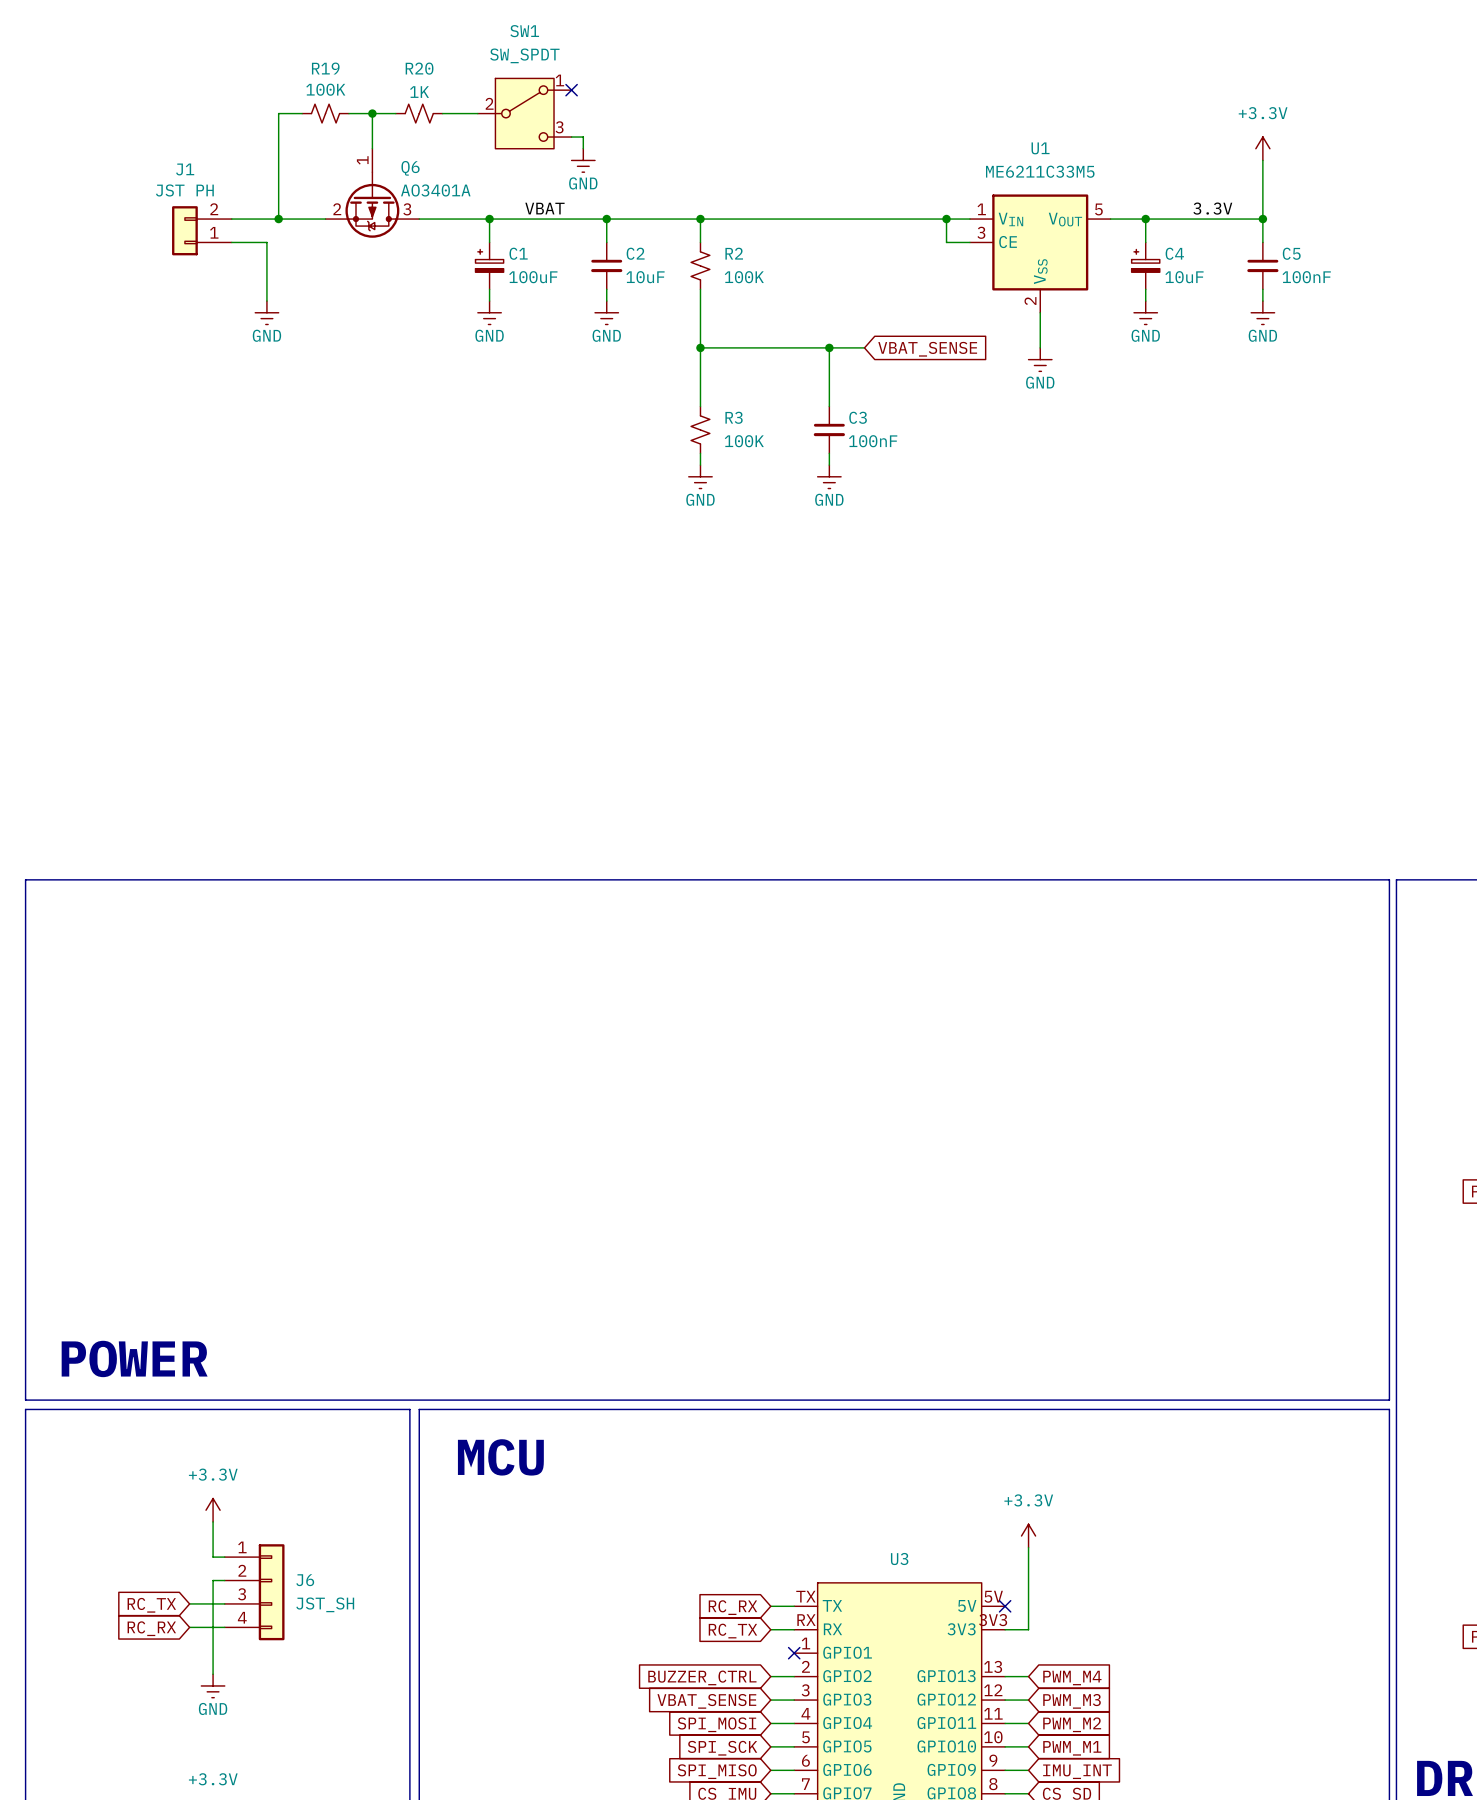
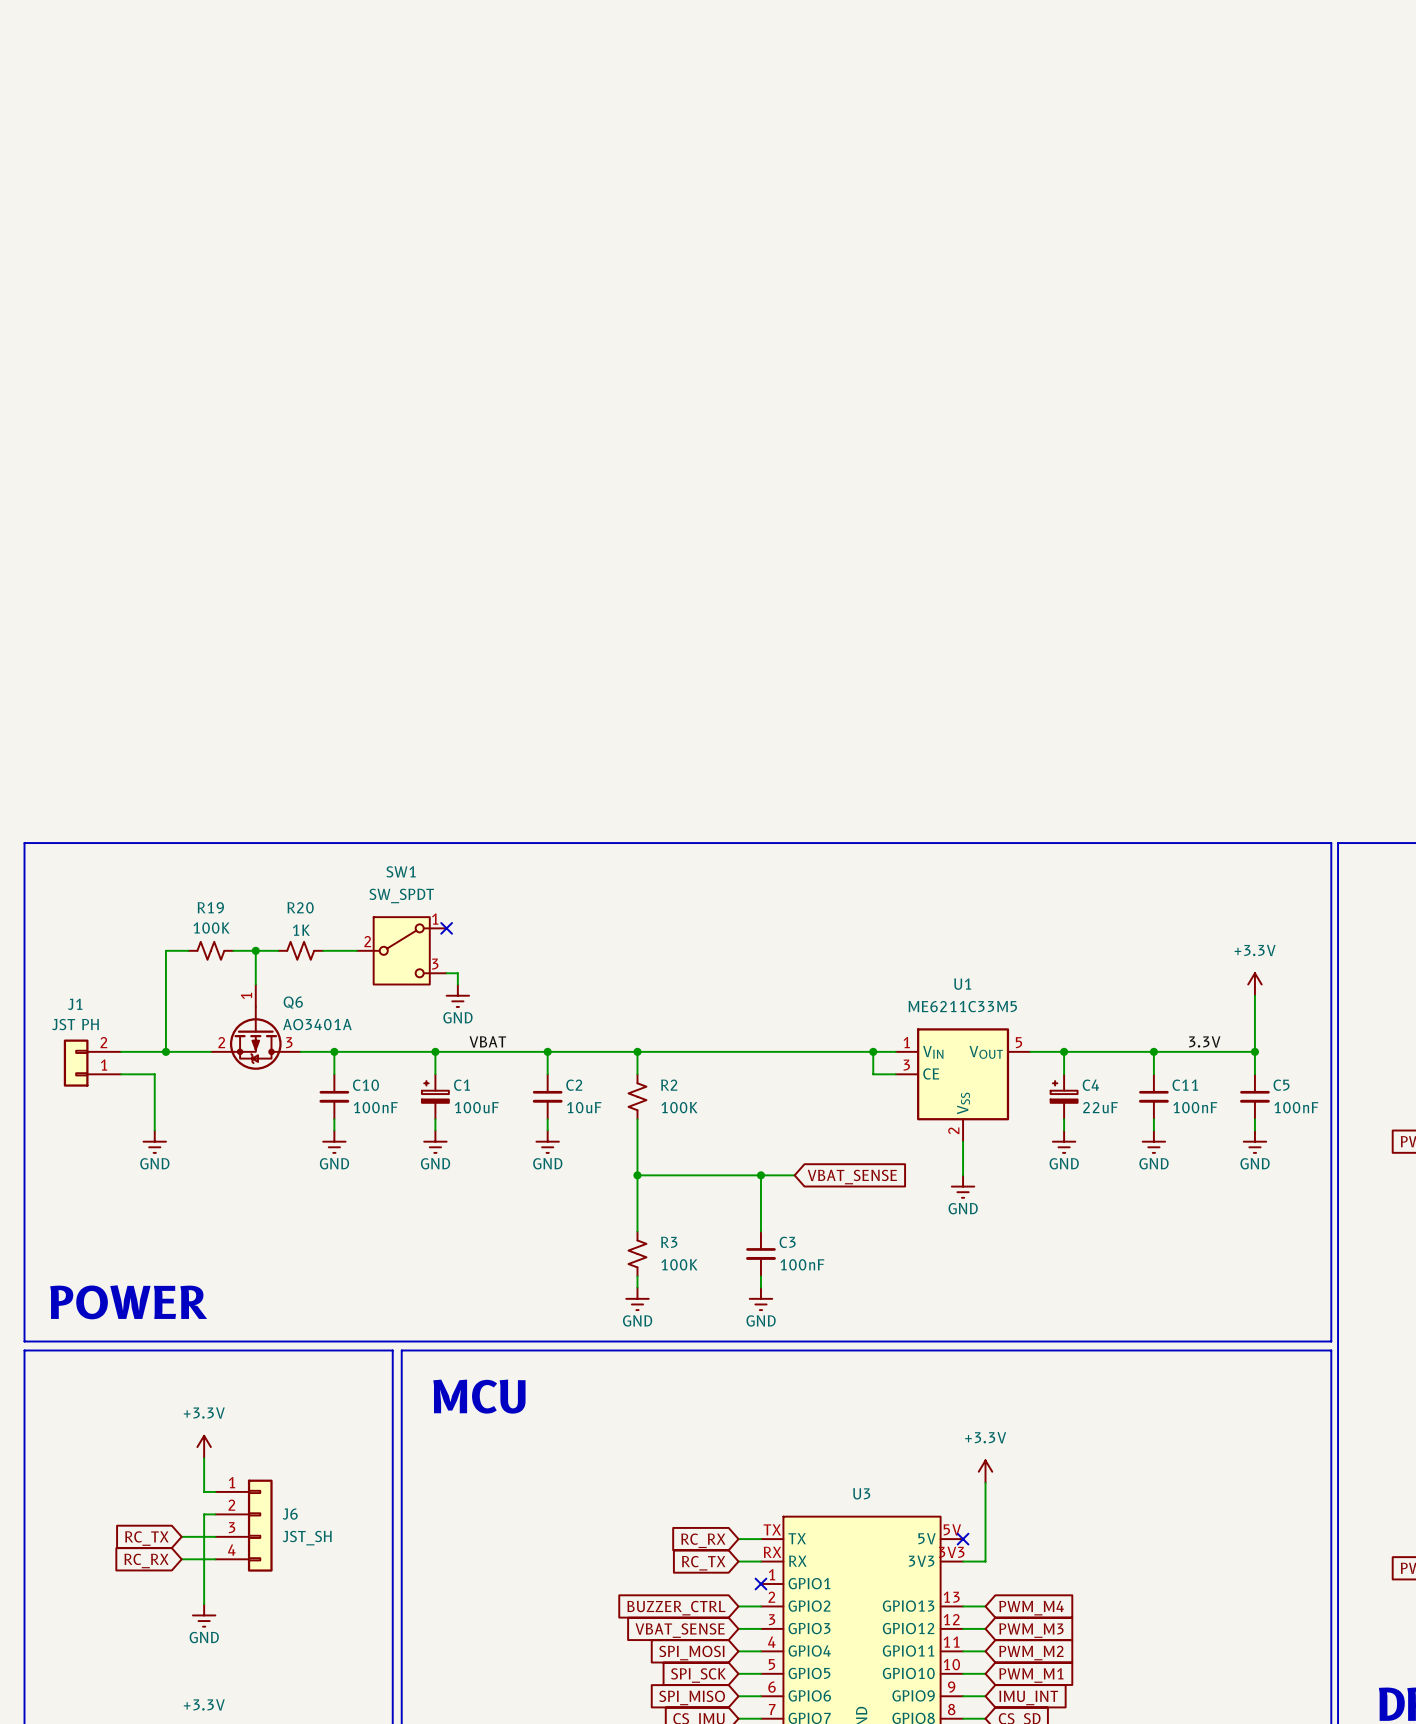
no-connect mark: (571, 90) -> none
wire: (302, 113) (278, 113) (278, 219) -> none
R19 position: (325, 113) -> (210, 950)
wire: (348, 113) (395, 113) -> none
wire: (372, 113) (372, 148) -> none
junction: (372, 113) -> none
R20 position: (419, 113) -> (300, 950)
wire: (442, 113) (477, 113) -> none
SW1 position: (524, 113) -> (401, 950)
wire: (571, 137) (583, 137) (583, 148) -> none
power symbol: +3.3V (1262, 148) -> none
power symbol: GND (583, 160) -> none
wire: (1262, 160) (1262, 242) -> none
Q6 position: (372, 193) -> (255, 1027)
label: VBAT (544, 208) -> none
label: 3.3V (1212, 208) -> none
wire: (231, 219) (325, 219) -> none
junction: (278, 219) -> none
wire: (419, 219) (969, 219) -> none
wire: (489, 219) (489, 242) -> none
junction: (489, 219) -> none
wire: (606, 219) (606, 242) -> none
junction: (606, 219) -> none
wire: (700, 219) (700, 242) -> none
junction: (700, 219) -> none
wire: (946, 219) (946, 242) (969, 242) -> none
junction: (946, 219) -> none
wire: (1110, 219) (1262, 219) -> none
wire: (1145, 219) (1145, 242) -> none
junction: (1145, 219) -> none
junction: (1262, 219) -> none
J1 position: (201, 230) -> (92, 1063)
wire: (231, 242) (266, 242) (266, 301) -> none
U1 position: (1040, 253) -> (963, 1084)
C1 position: (489, 265) -> (435, 1096)
C2 position: (606, 265) -> (547, 1096)
R2 position: (700, 265) -> (637, 1096)
C4 position: (1145, 265) -> (1064, 1096)
C5 position: (1262, 265) -> (1254, 1096)
C4 value: 10uF (1184, 277) -> 22uF (1100, 1107)
wire: (489, 289) (489, 301) -> none
wire: (606, 289) (606, 301) -> none
wire: (700, 289) (700, 406) -> none
wire: (1145, 289) (1145, 301) -> none
wire: (1262, 289) (1262, 301) -> none
power symbol: GND (266, 312) -> none
power symbol: GND (489, 312) -> none
power symbol: GND (606, 312) -> none
wire: (1040, 312) (1040, 347) -> none
power symbol: GND (1145, 312) -> none
power symbol: GND (1262, 312) -> none
wire: (700, 347) (864, 347) -> none
junction: (700, 347) -> none
wire: (829, 347) (829, 406) -> none
junction: (829, 347) -> none
global label: VBAT_SENSE (927, 349) -> none
power symbol: GND (1040, 359) -> none
R3 position: (700, 429) -> (637, 1253)
C3 position: (829, 429) -> (760, 1253)
wire: (700, 453) (700, 465) -> none
wire: (829, 453) (829, 465) -> none
power symbol: GND (700, 476) -> none
power symbol: GND (829, 476) -> none
no-connect mark: none -> (446, 928)
wire: none -> (188, 950) (165, 950) (165, 1051)
wire: none -> (233, 950) (278, 950)
wire: none -> (255, 950) (255, 984)
junction: none -> (255, 950)
wire: none -> (323, 950) (356, 950)
wire: none -> (446, 973) (457, 973) (457, 984)
power symbol: none -> +3.3V (1254, 984)
power symbol: none -> GND (457, 995)
wire: none -> (1254, 995) (1254, 1074)
label: none -> VBAT (487, 1041)
label: none -> 3.3V (1204, 1041)
wire: none -> (121, 1051) (210, 1051)
junction: none -> (165, 1051)
wire: none -> (300, 1051) (895, 1051)
wire: none -> (334, 1051) (334, 1074)
junction: none -> (334, 1051)
wire: none -> (435, 1051) (435, 1074)
junction: none -> (435, 1051)
wire: none -> (547, 1051) (547, 1074)
junction: none -> (547, 1051)
wire: none -> (637, 1051) (637, 1074)
junction: none -> (637, 1051)
wire: none -> (873, 1051) (873, 1074) (895, 1074)
junction: none -> (873, 1051)
wire: none -> (1030, 1051) (1254, 1051)
wire: none -> (1064, 1051) (1064, 1074)
junction: none -> (1064, 1051)
wire: none -> (1153, 1051) (1153, 1074)
junction: none -> (1153, 1051)
junction: none -> (1254, 1051)
wire: none -> (121, 1074) (154, 1074) (154, 1130)
C10: none -> 100nF (334, 1096)
C11: none -> 100nF (1153, 1096)
wire: none -> (334, 1119) (334, 1130)
wire: none -> (435, 1119) (435, 1130)
wire: none -> (547, 1119) (547, 1130)
wire: none -> (637, 1119) (637, 1231)
wire: none -> (1064, 1119) (1064, 1130)
wire: none -> (1153, 1119) (1153, 1130)
wire: none -> (1254, 1119) (1254, 1130)
power symbol: none -> GND (154, 1141)
power symbol: none -> GND (334, 1141)
power symbol: none -> GND (435, 1141)
power symbol: none -> GND (547, 1141)
wire: none -> (963, 1141) (963, 1175)
power symbol: none -> GND (1064, 1141)
power symbol: none -> GND (1153, 1141)
power symbol: none -> GND (1254, 1141)
wire: none -> (637, 1175) (794, 1175)
junction: none -> (637, 1175)
wire: none -> (760, 1175) (760, 1231)
junction: none -> (760, 1175)
global label: none -> VBAT_SENSE (852, 1177)
power symbol: none -> GND (963, 1186)
wire: none -> (637, 1276) (637, 1287)
wire: none -> (760, 1276) (760, 1287)
power symbol: none -> GND (637, 1298)
power symbol: none -> GND (760, 1298)

